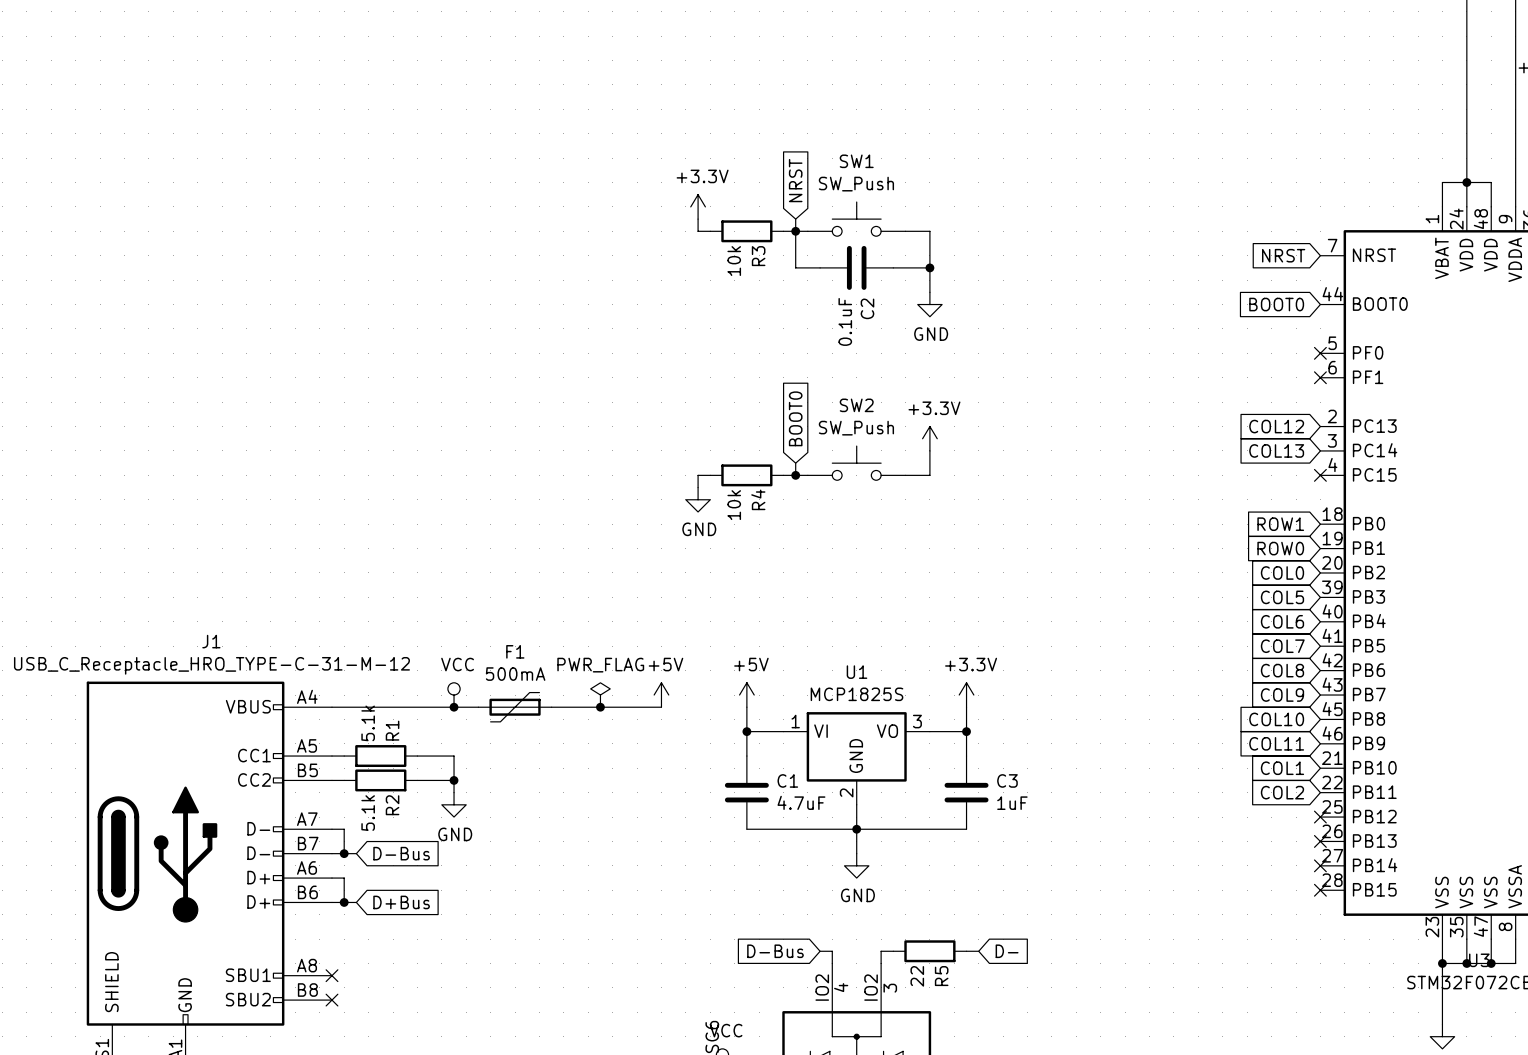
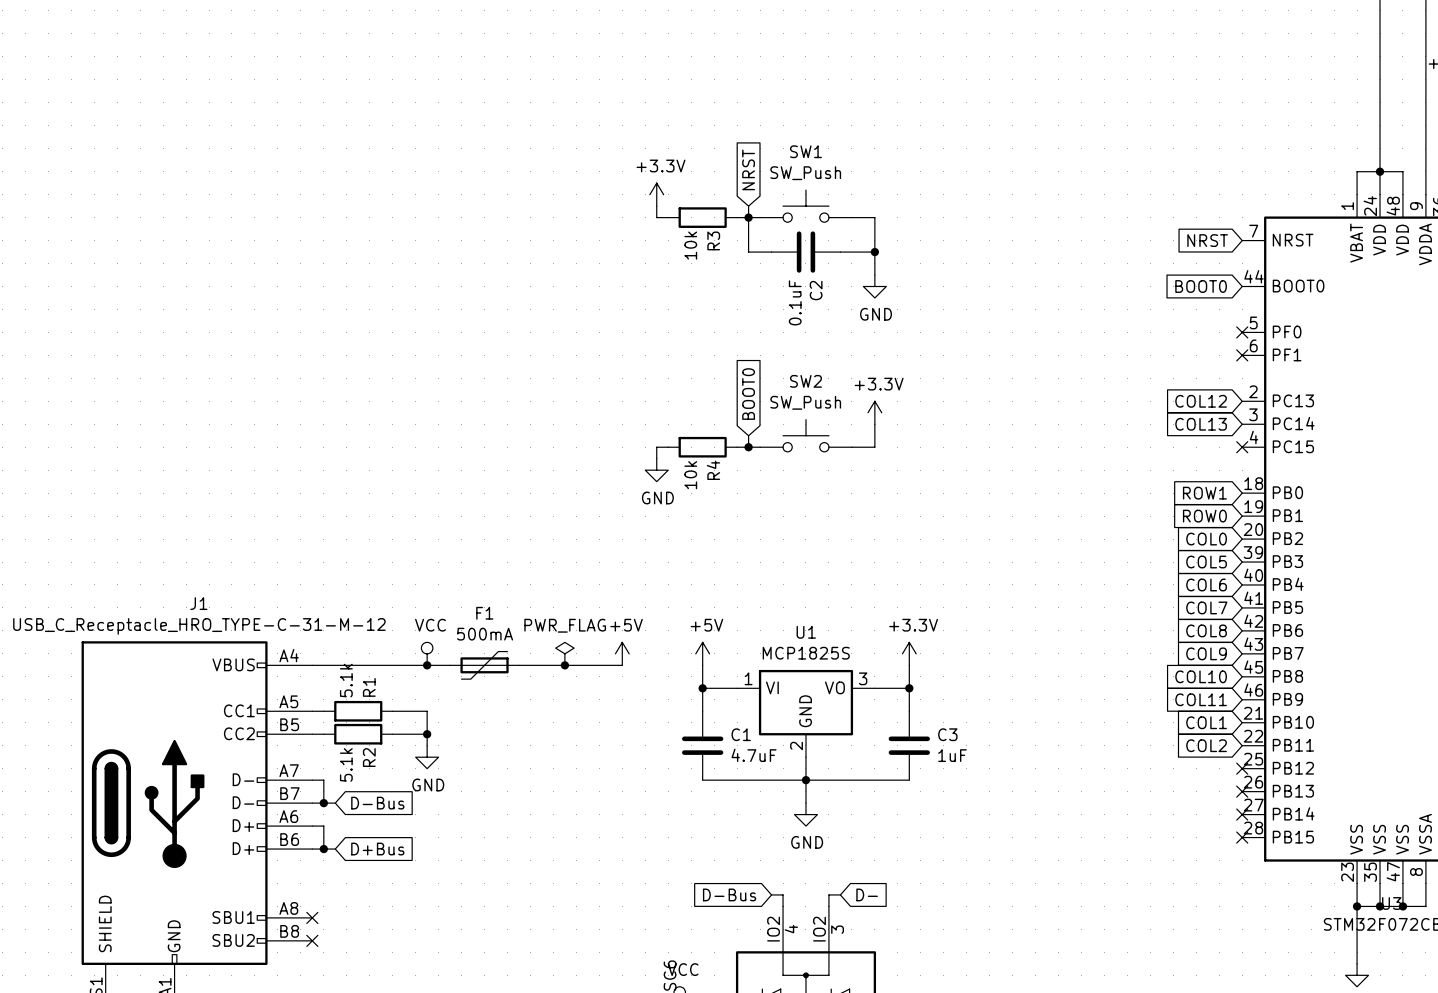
R5: 22 (929, 951) -> none
wire: (966, 951) (978, 951) -> none
global label position: D- (1007, 951) -> D- (867, 894)

